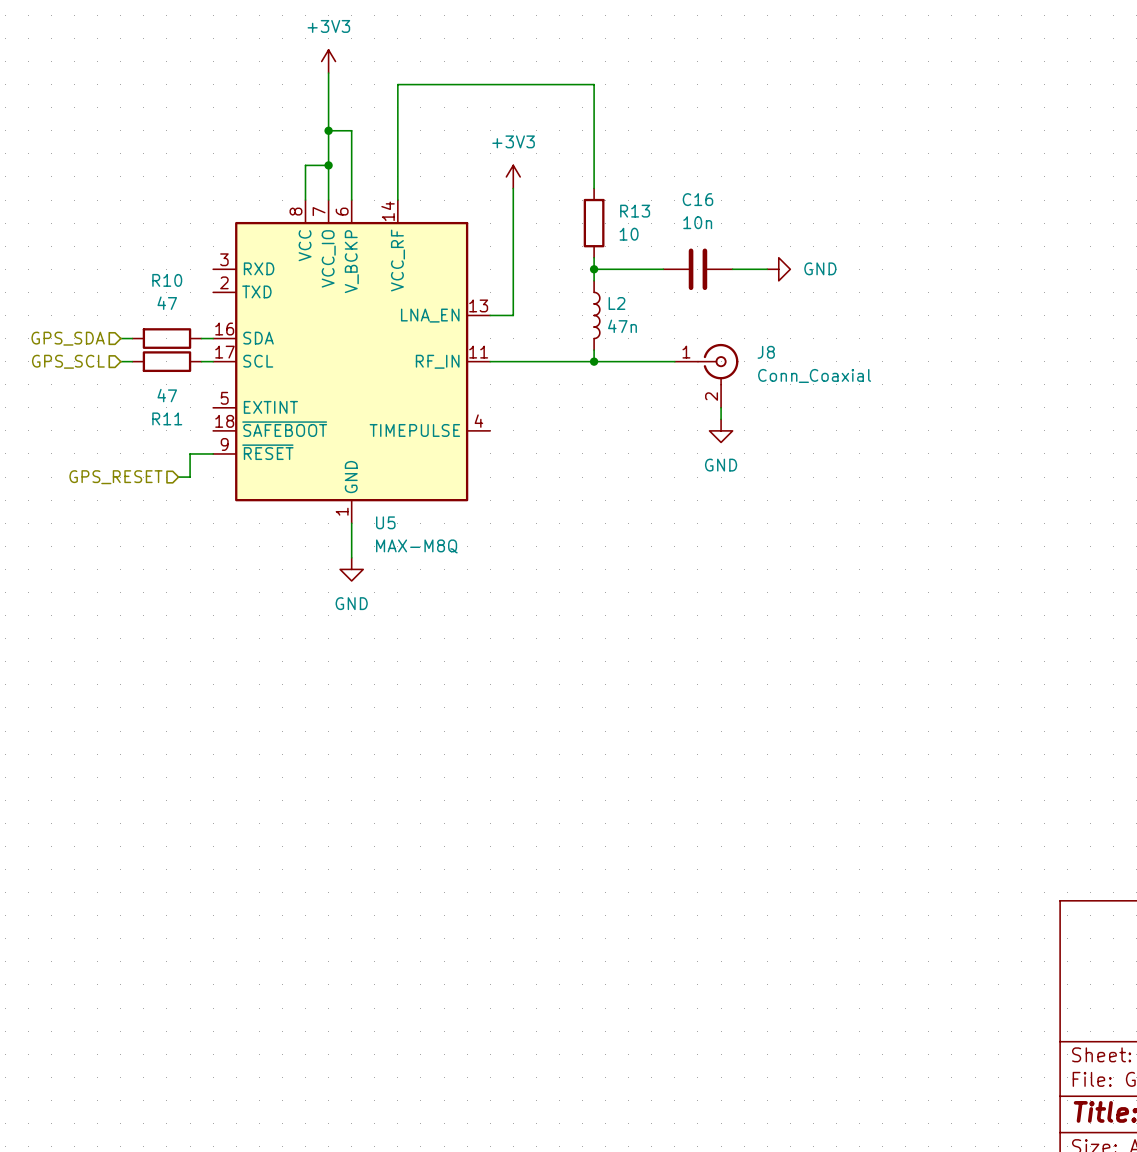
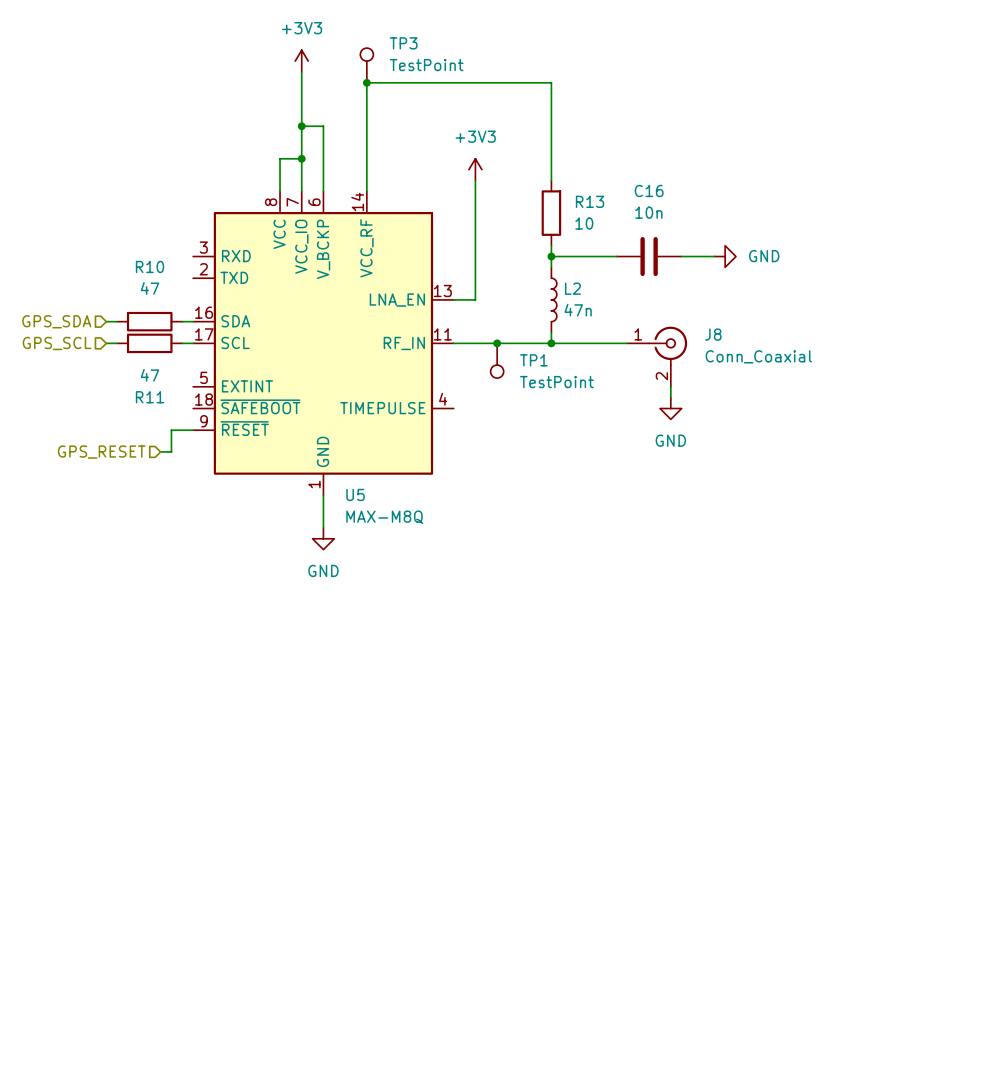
TP3: none -> TestPoint (366, 65)
junction: none -> (366, 82)
junction: none -> (497, 343)
TP1: none -> TestPoint (497, 360)

